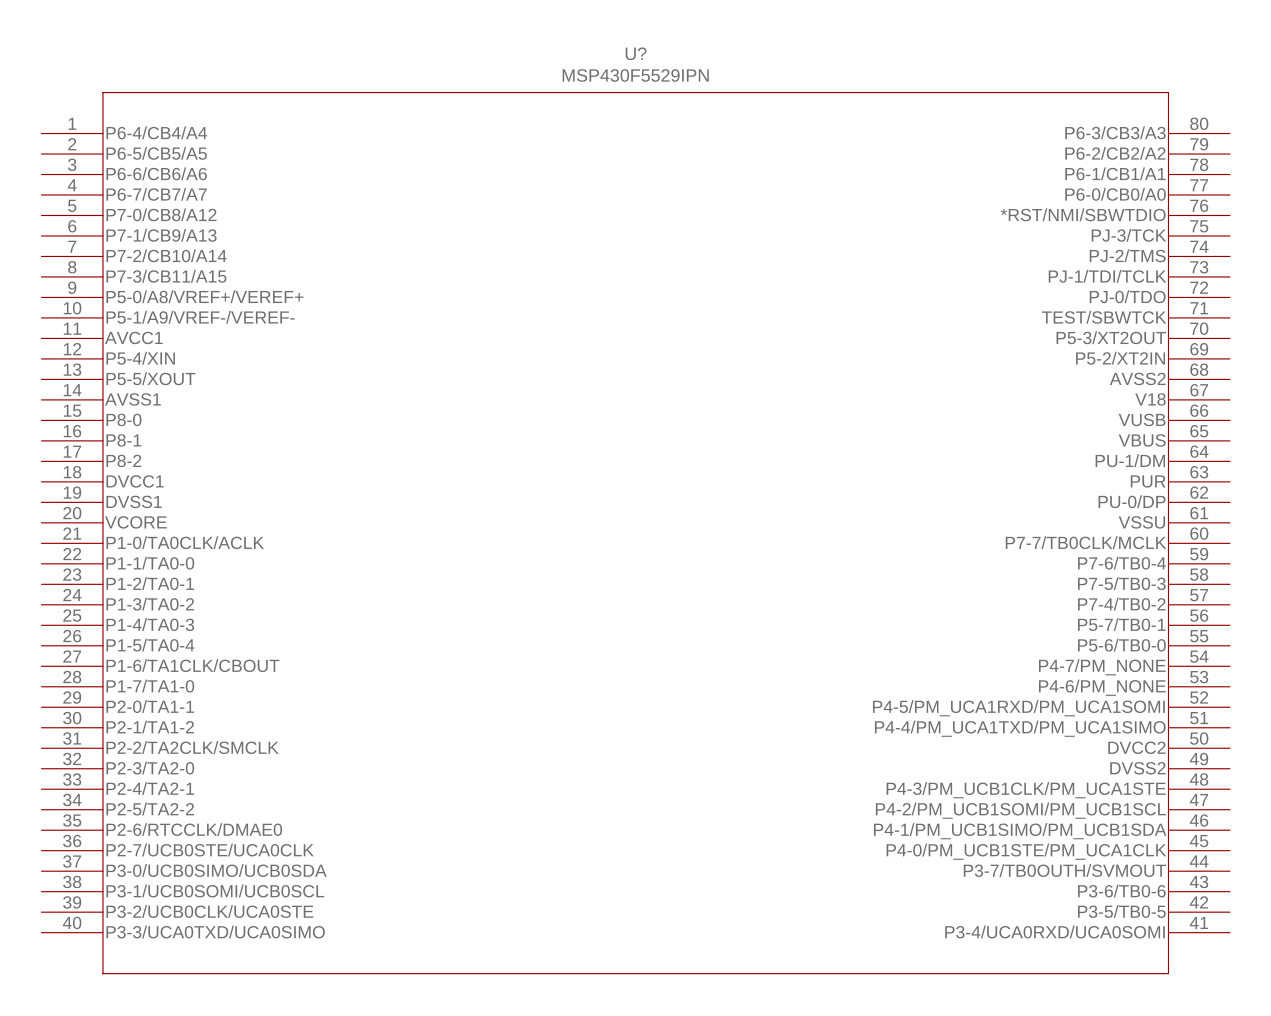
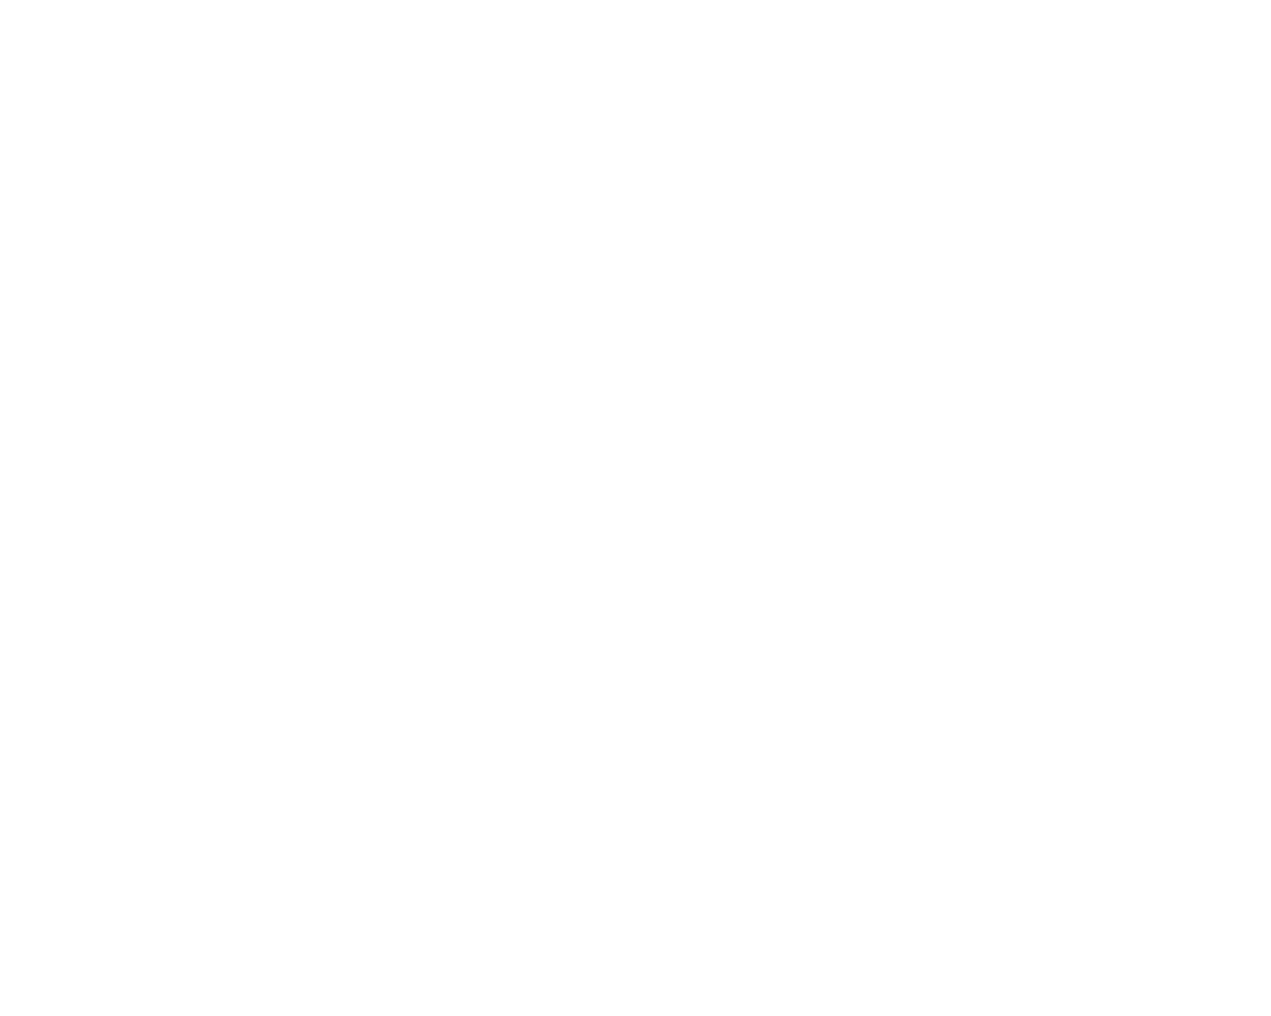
U?: MSP430F5529IPN (635, 533) -> none

